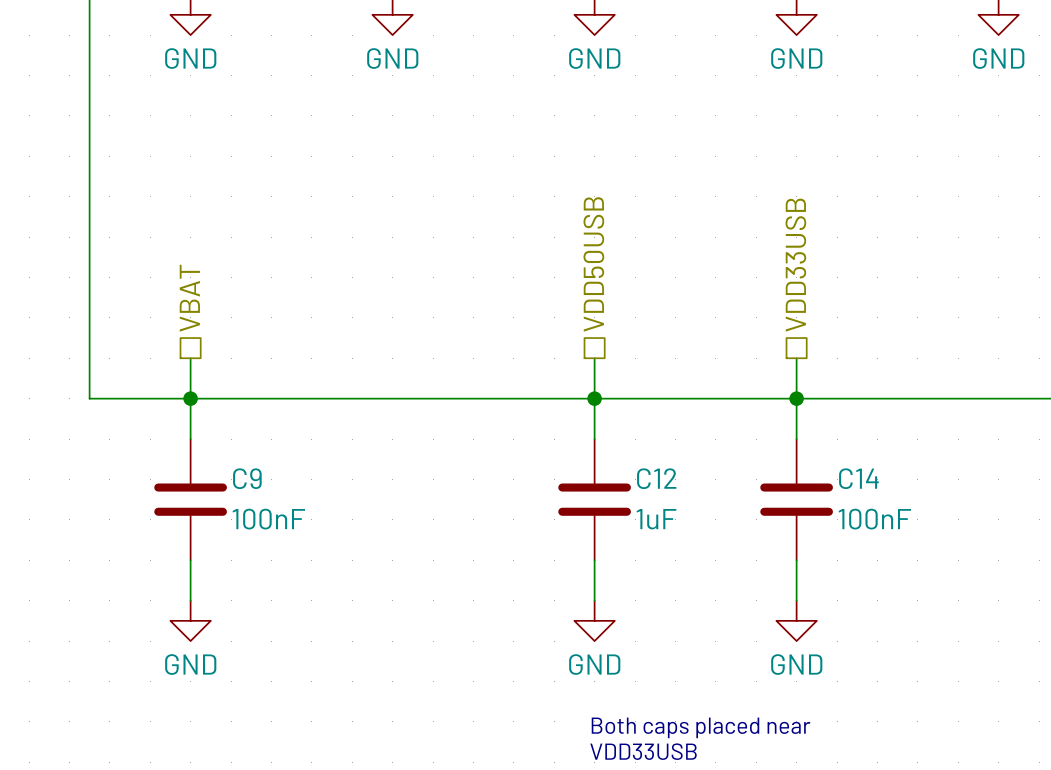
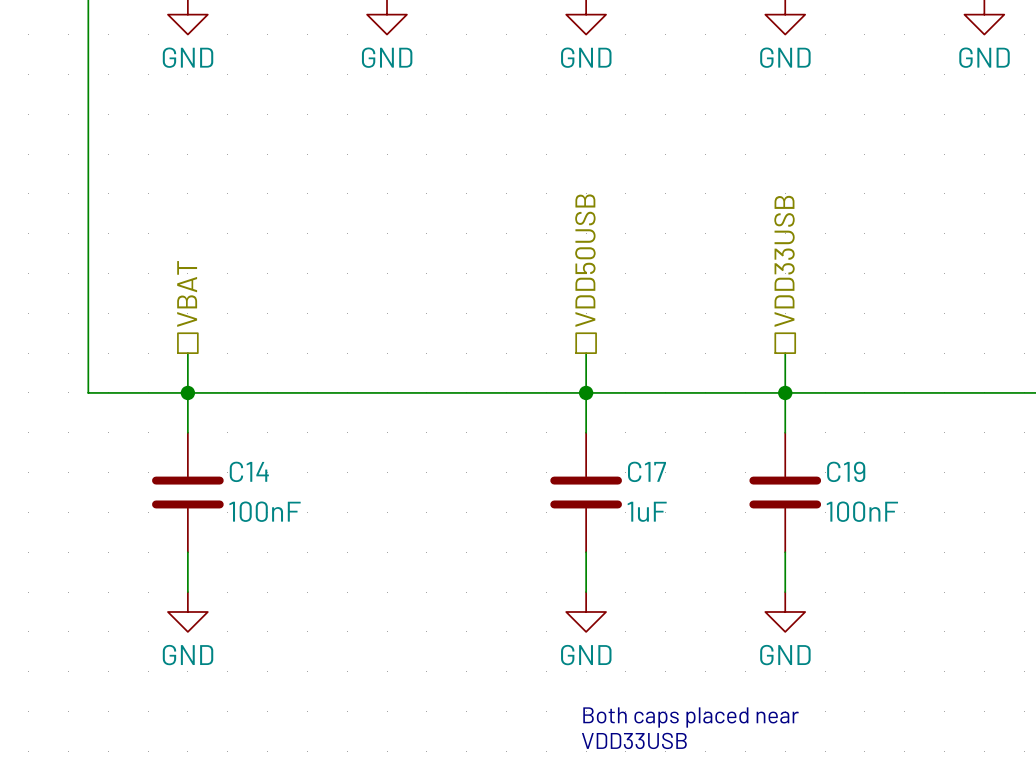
C9 name: C9 (247, 478) -> C14 (249, 471)
C12 name: C12 (656, 478) -> C17 (647, 471)
C14 name: C14 (858, 478) -> C19 (846, 471)

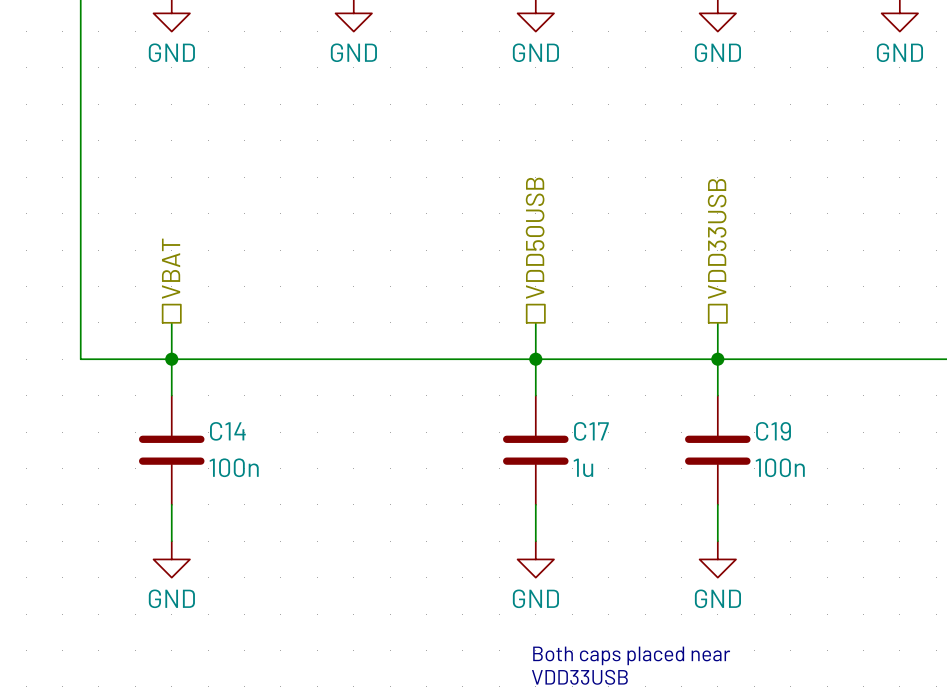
C14 value: 100nF (265, 511) -> 100n (234, 467)
C17 value: 1uF (647, 511) -> 1u (583, 467)
C19 value: 100nF (862, 511) -> 100n (780, 467)

